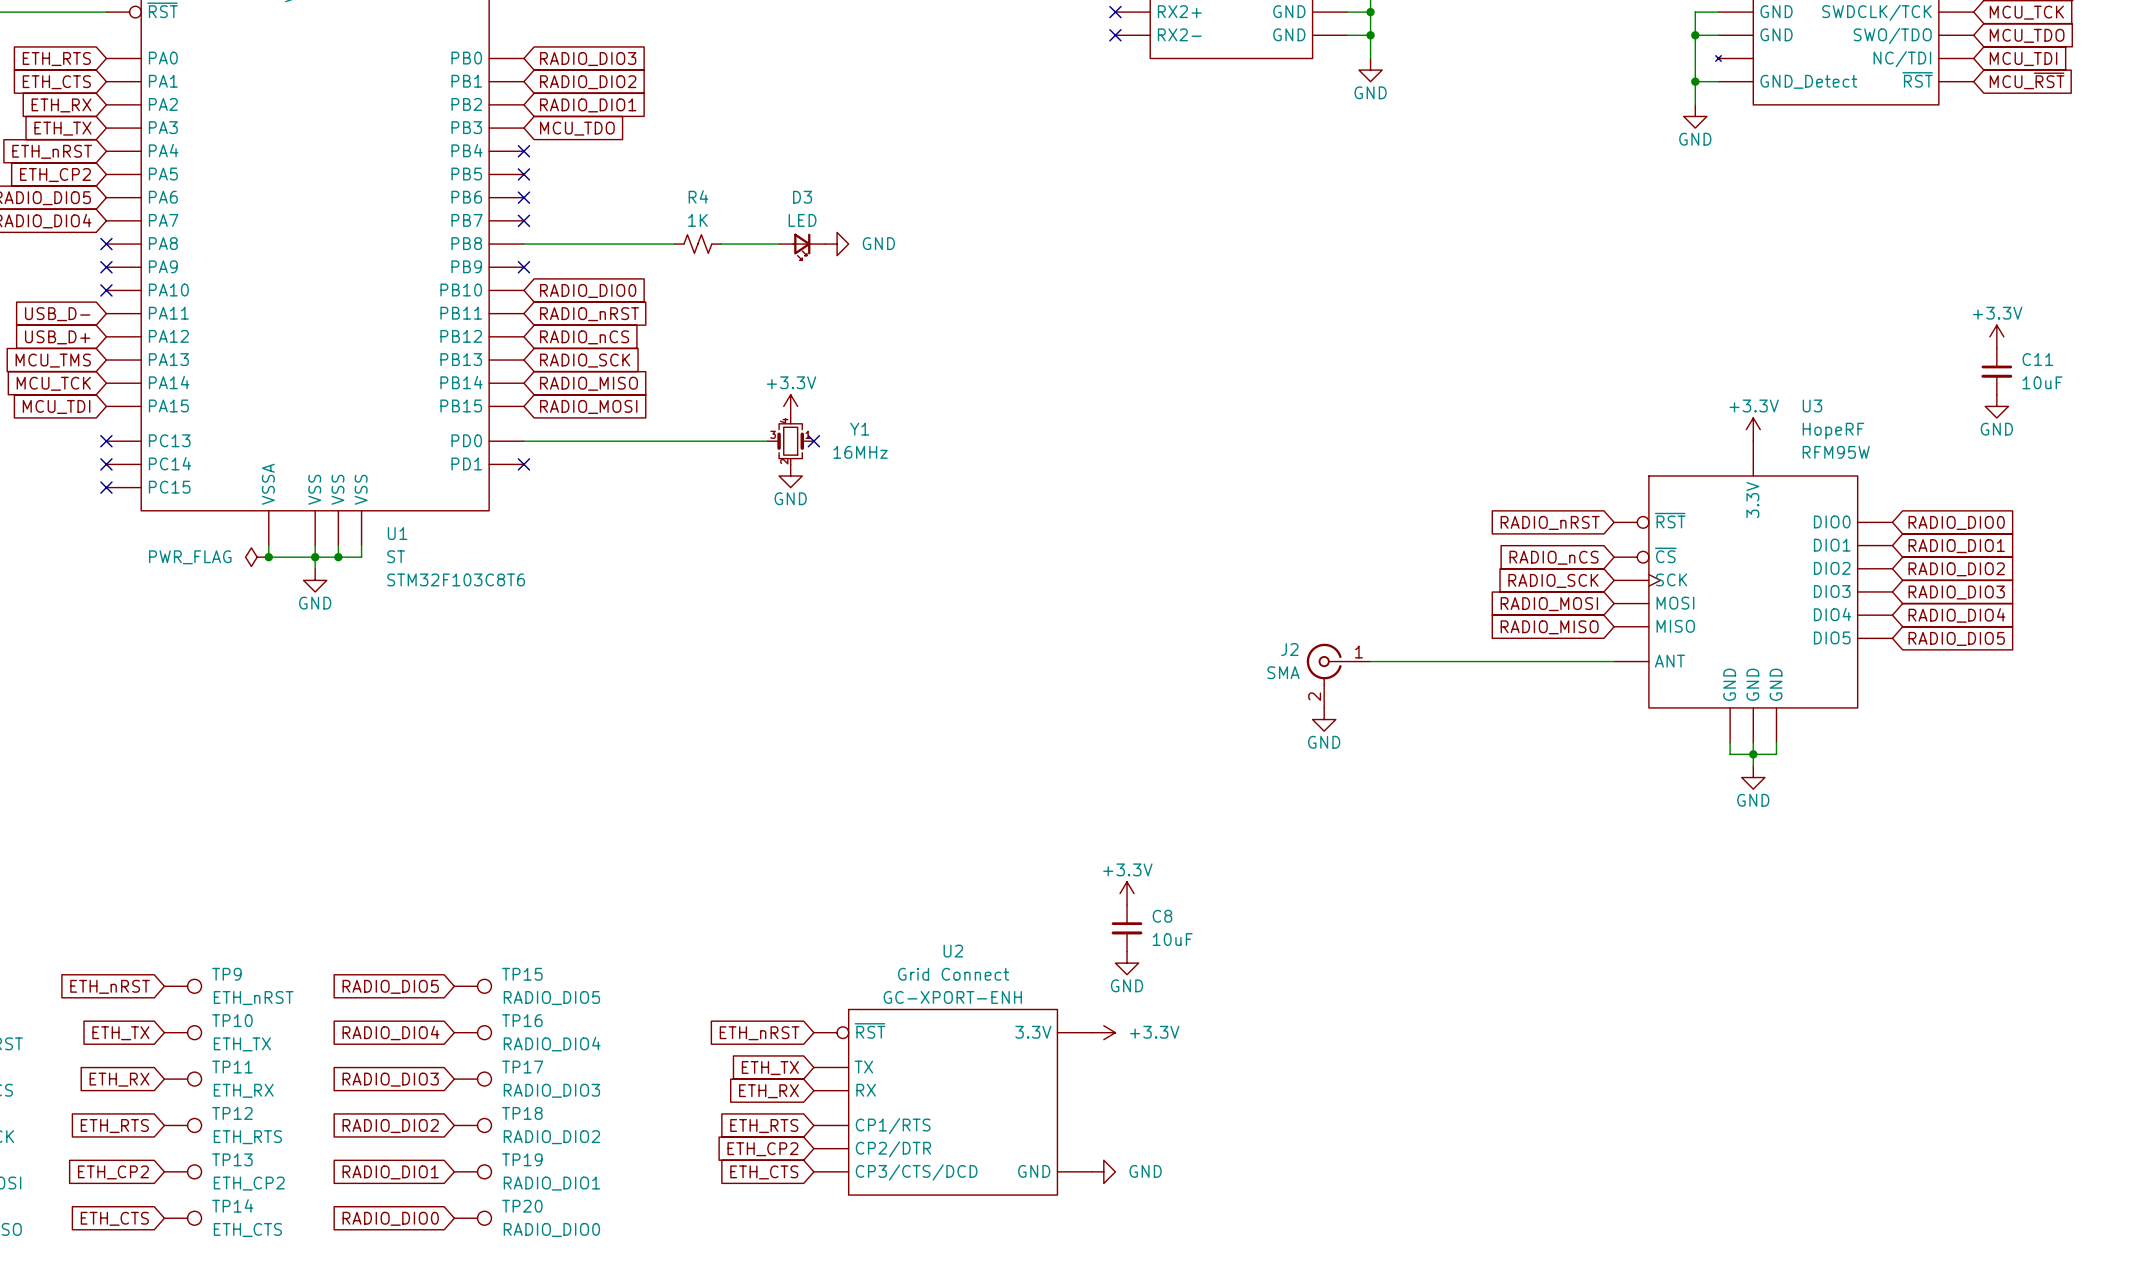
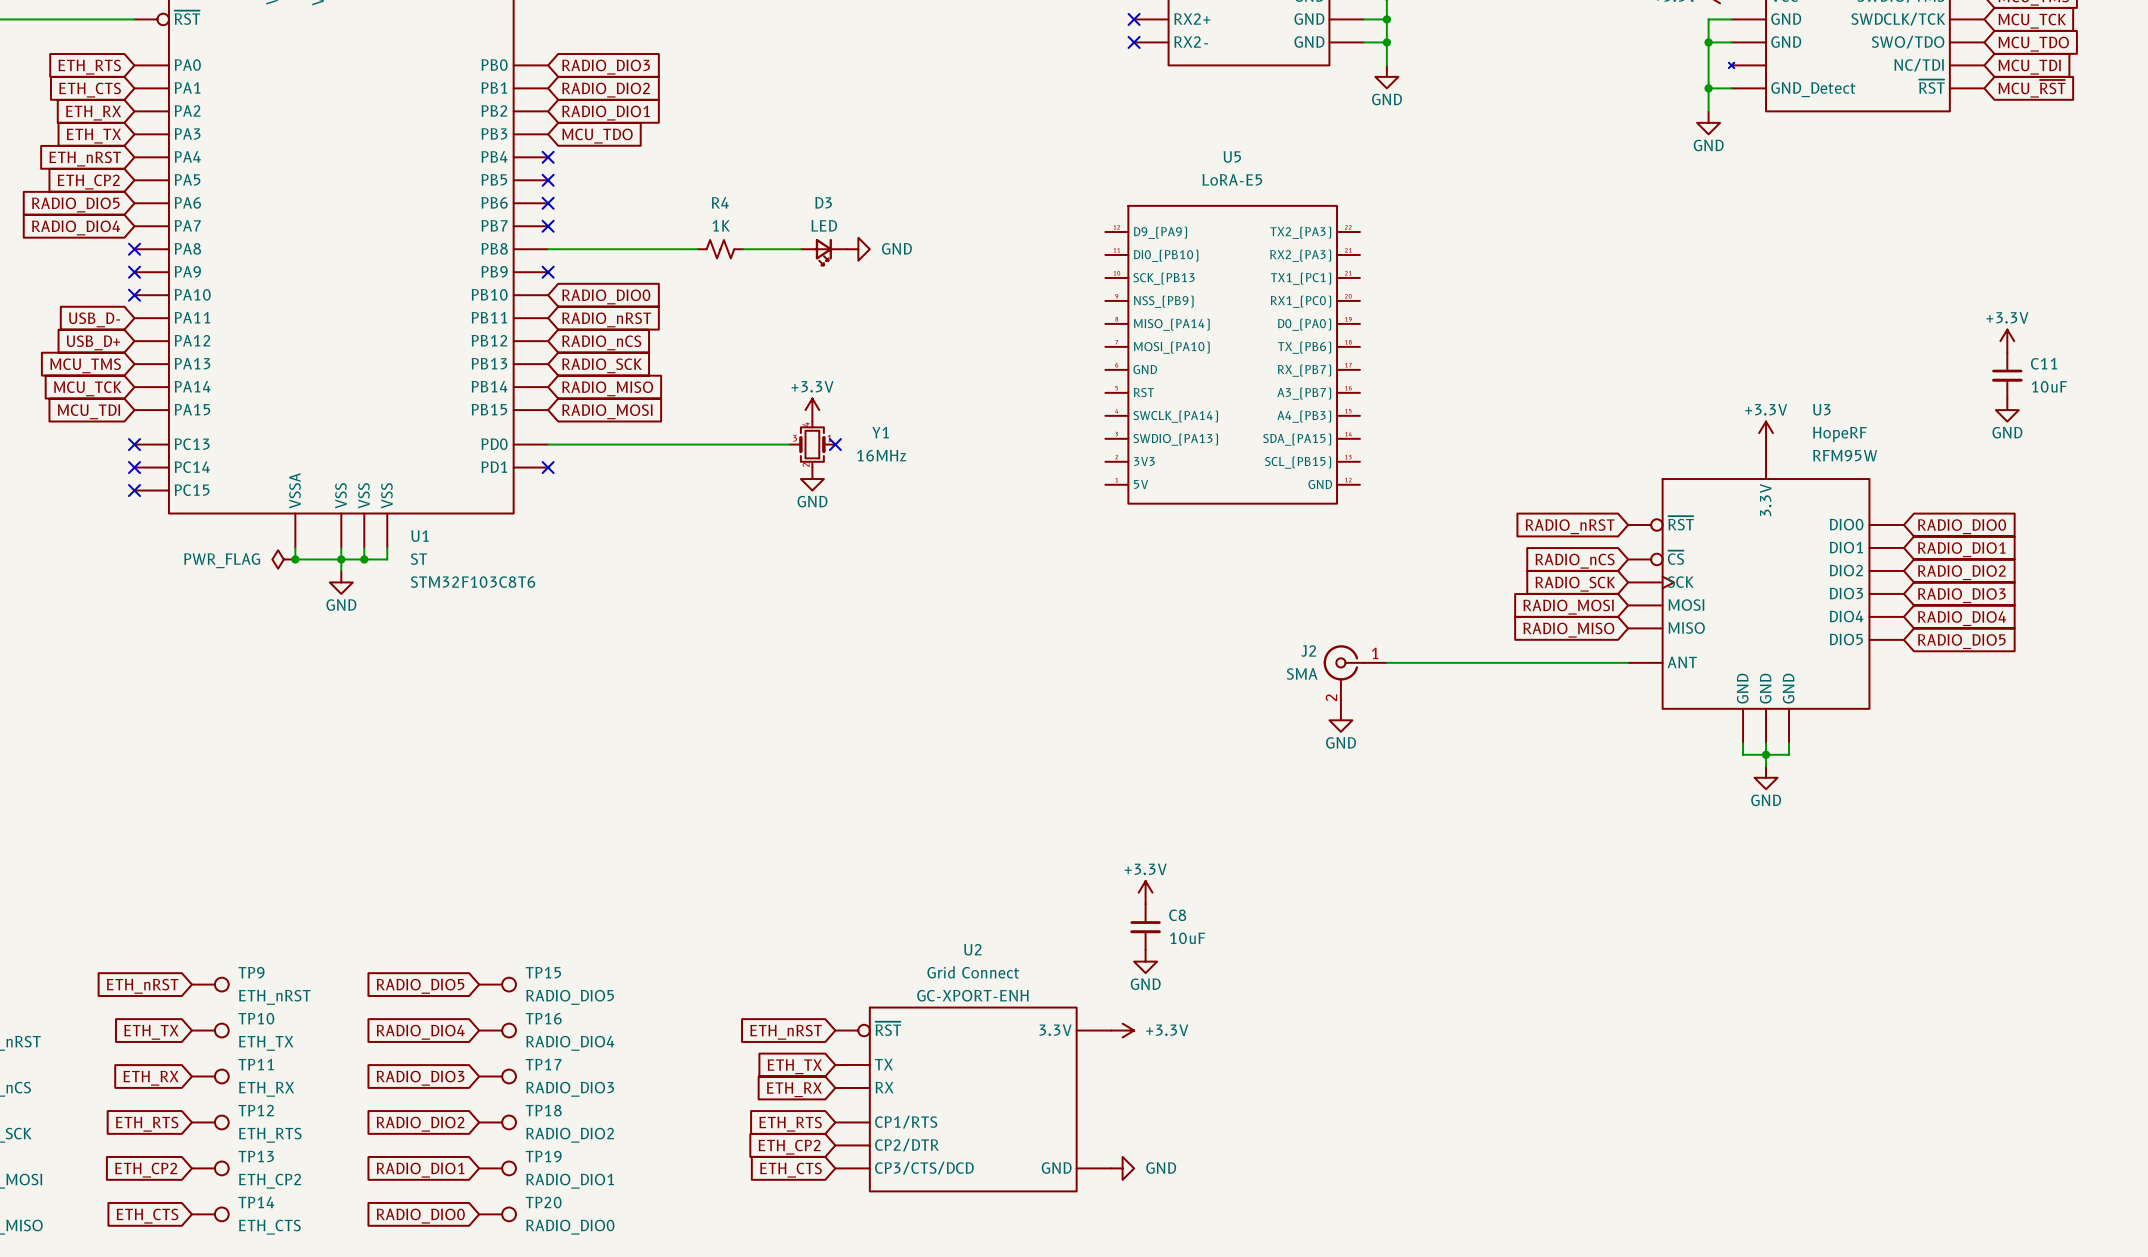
U5: none -> LoRA-E5 (1232, 354)

